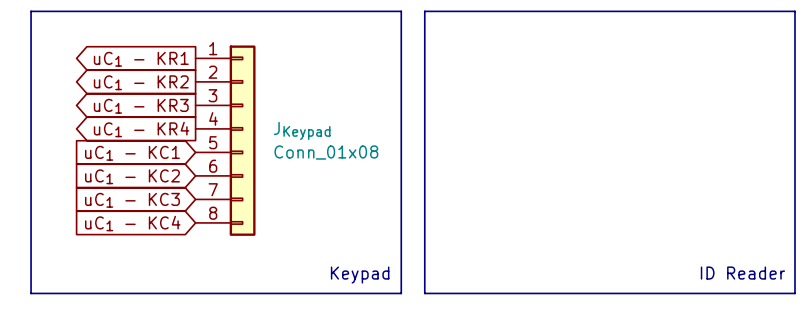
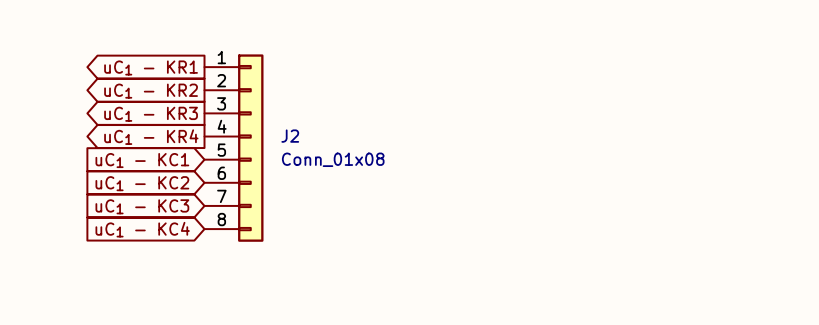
line: (31, 11) (401, 11) (401, 293) (31, 293) (31, 11) -> none
line: (424, 11) (795, 11) (795, 293) (424, 293) (424, 11) -> none
JKeypad name: JKeypad (302, 130) -> J2 (290, 136)
text: ID Reader (742, 273) -> none
text: Keypad (360, 275) -> none

